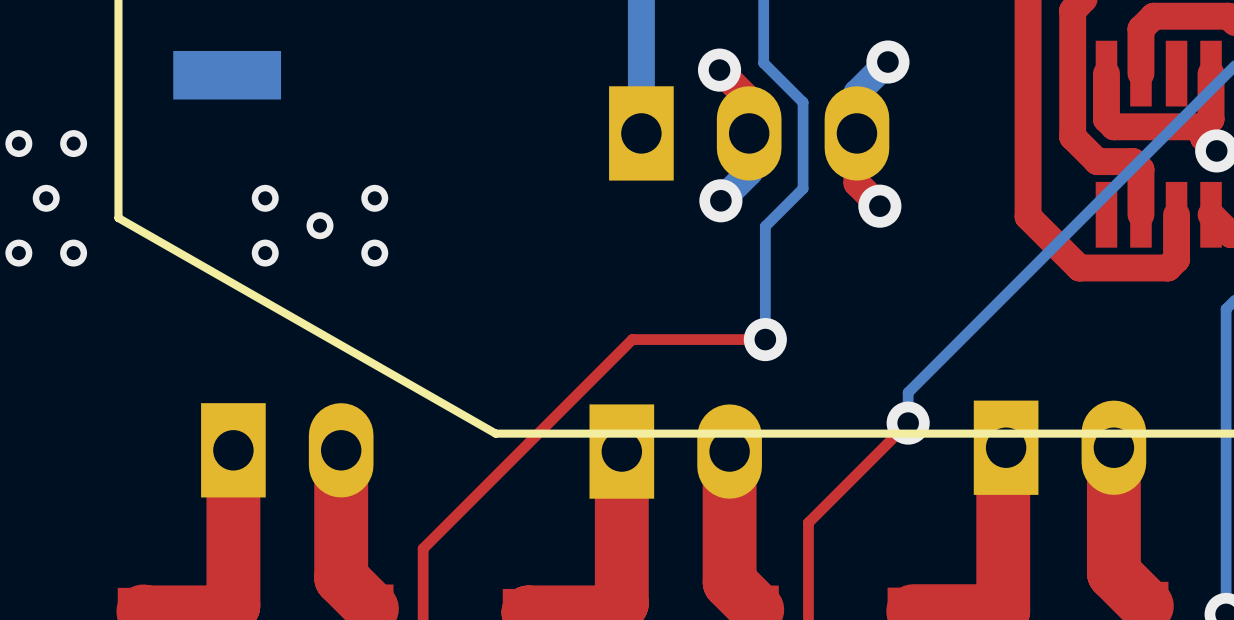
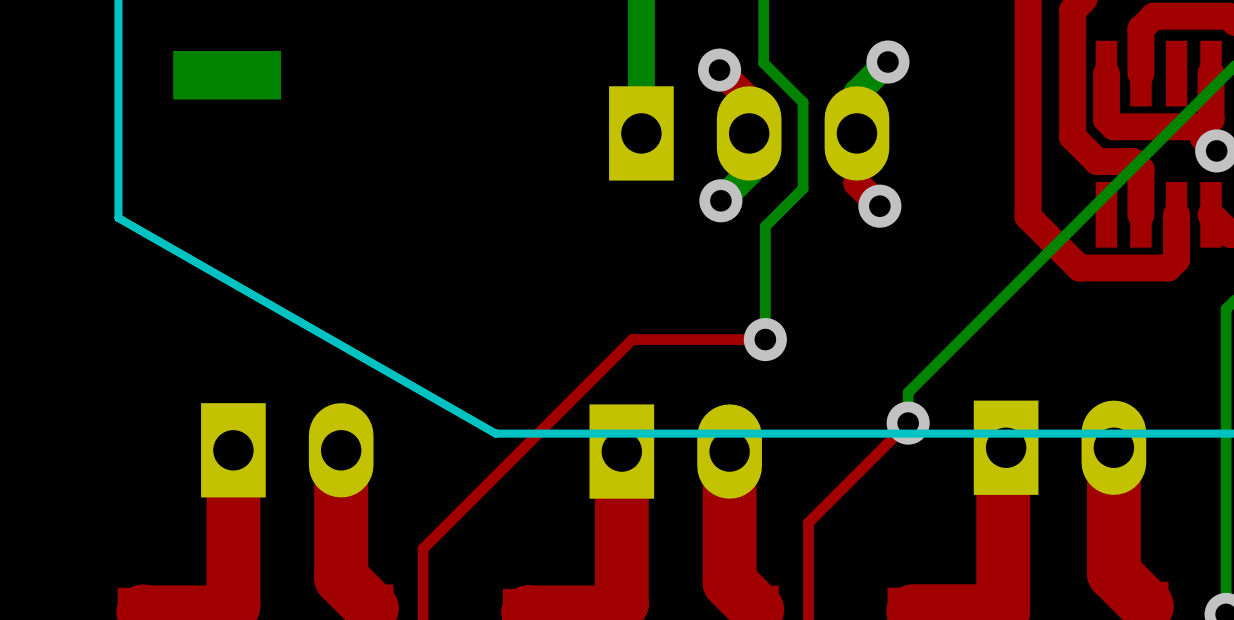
via: (18, 143) -> none
via: (73, 143) -> none
via: (46, 198) -> none
via: (265, 198) -> none
via: (374, 198) -> none
via: (319, 225) -> none
via: (18, 253) -> none
via: (73, 253) -> none
via: (265, 253) -> none
via: (374, 253) -> none

